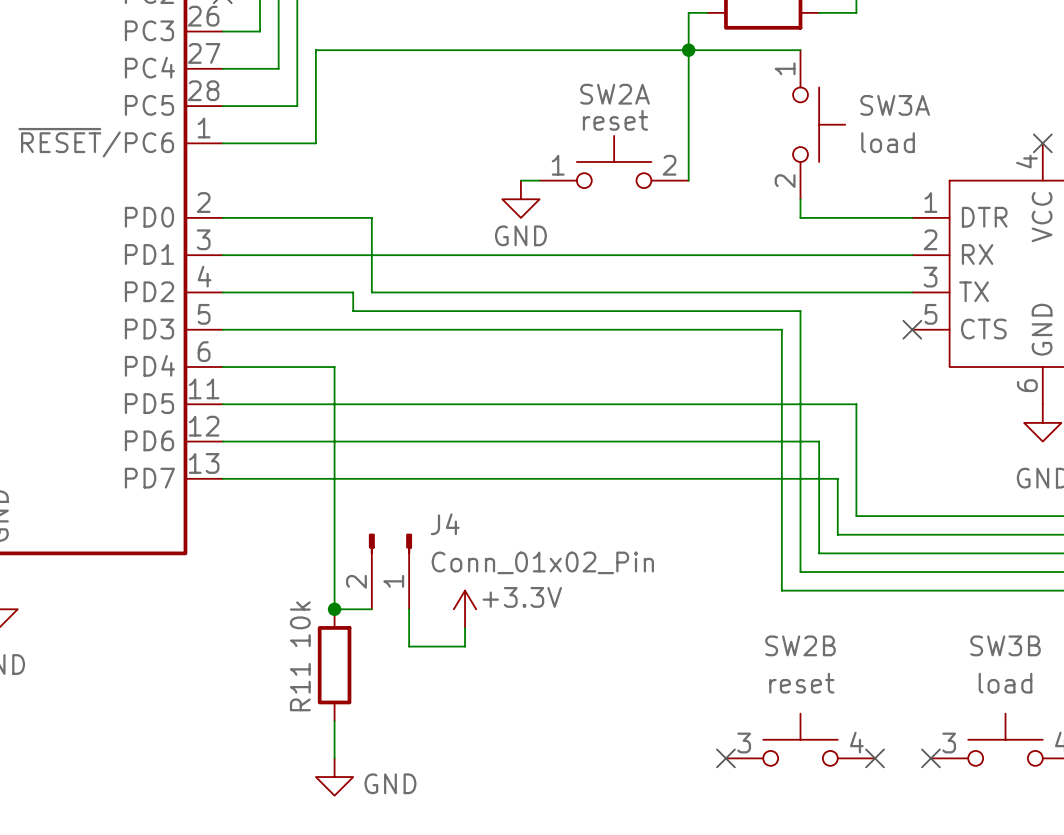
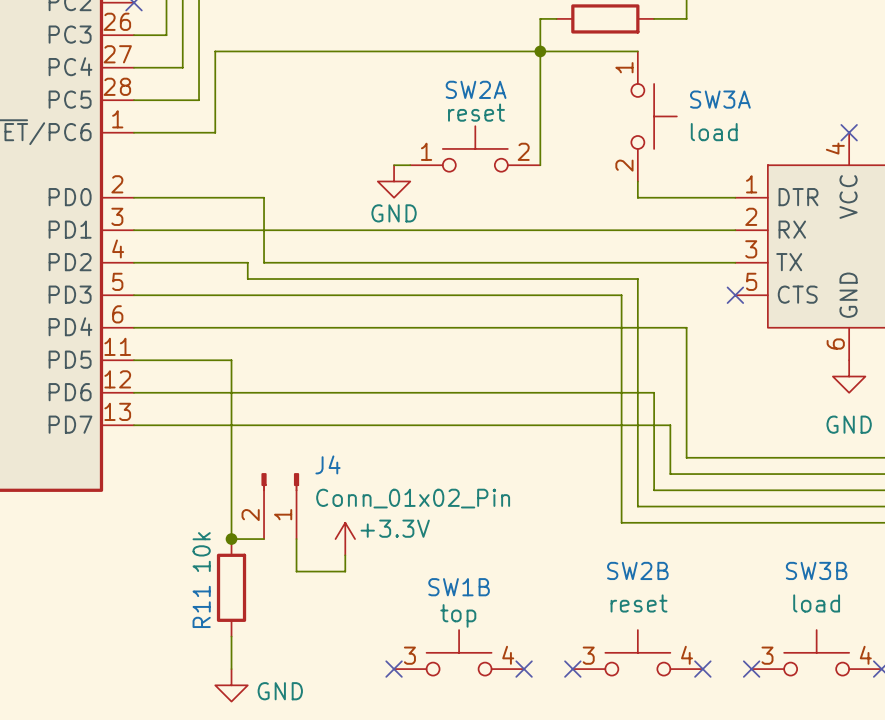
wire: (334, 367) (334, 404) (856, 404) -> (231, 327) (686, 327) (686, 360)
SW1B: none -> top (459, 652)
no-connect mark: none -> (394, 669)
no-connect mark: none -> (524, 669)

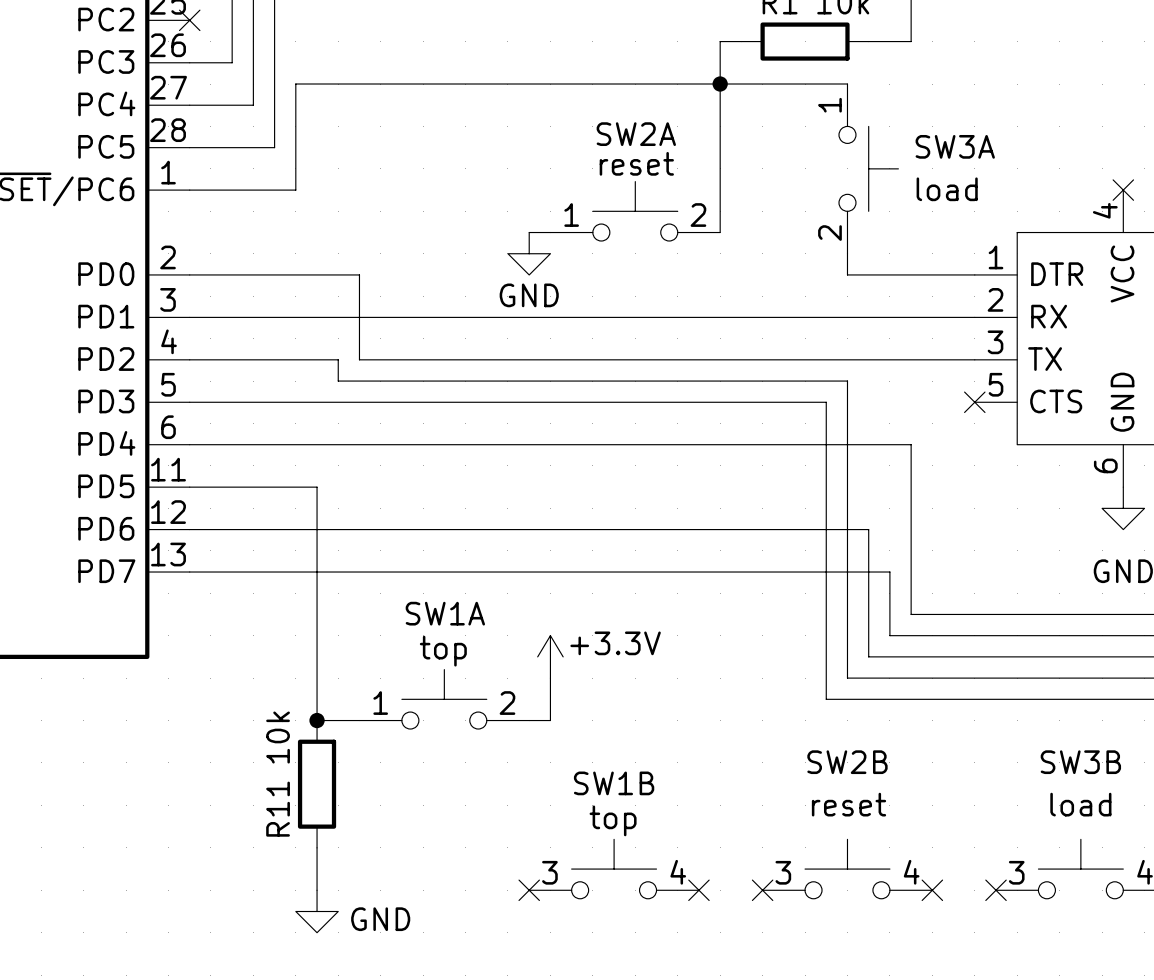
J4: Conn_01x02_Pin (280, 506) -> none
wire: none -> (550, 678) (550, 720) (529, 720)
SW1A: none -> top (444, 699)
wire: (296, 539) (296, 571) (345, 571) (345, 555) -> none
power symbol position: +3.3V (345, 539) -> +3.3V (550, 656)

